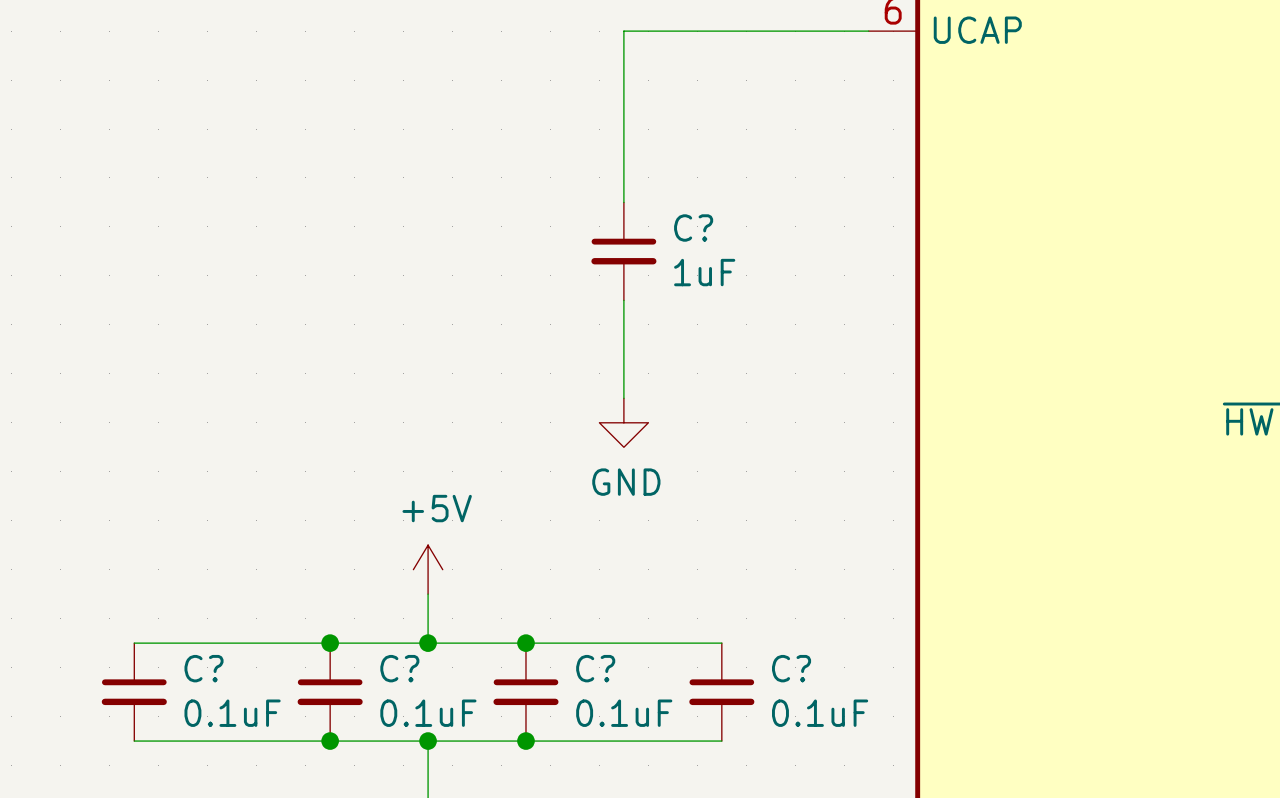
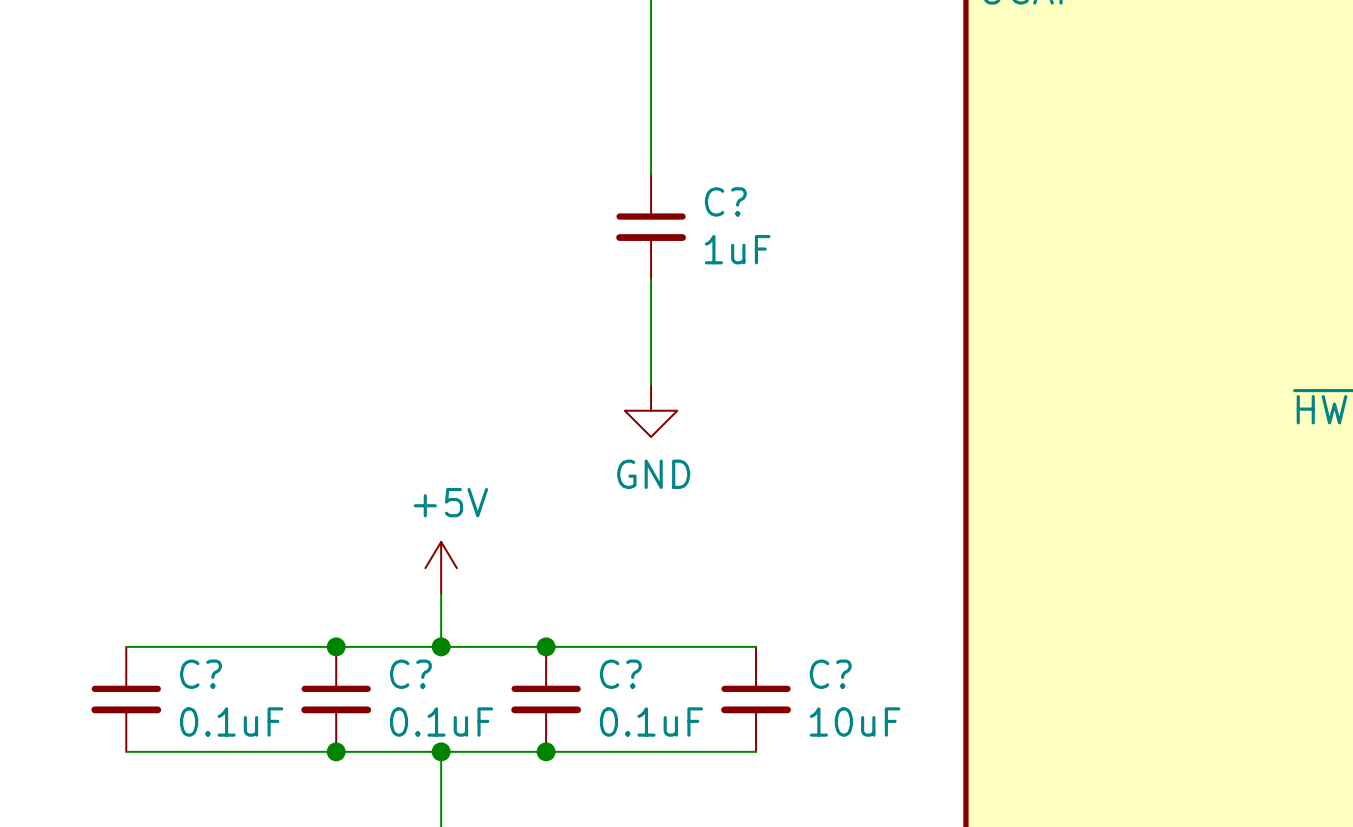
C? value: 0.1uF (820, 713) -> 10uF (855, 722)

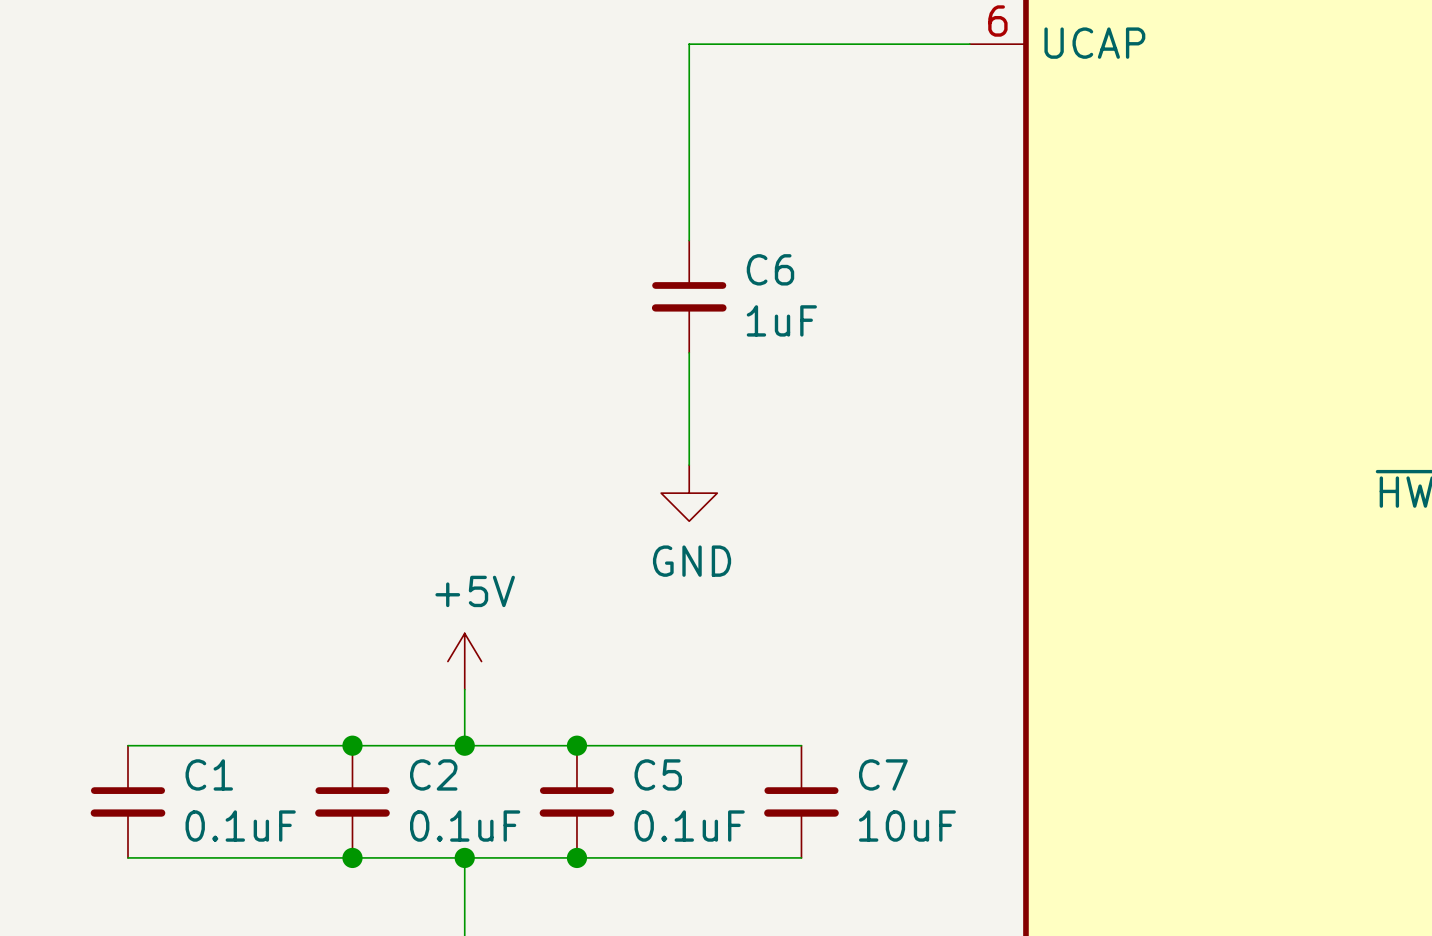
C? name: C? (725, 201) -> C6 (770, 269)
C? name: C? (200, 674) -> C1 (209, 774)
C? name: C? (410, 674) -> C2 (433, 774)
C? name: C? (620, 674) -> C5 (658, 774)
C? name: C? (830, 674) -> C7 (883, 774)

